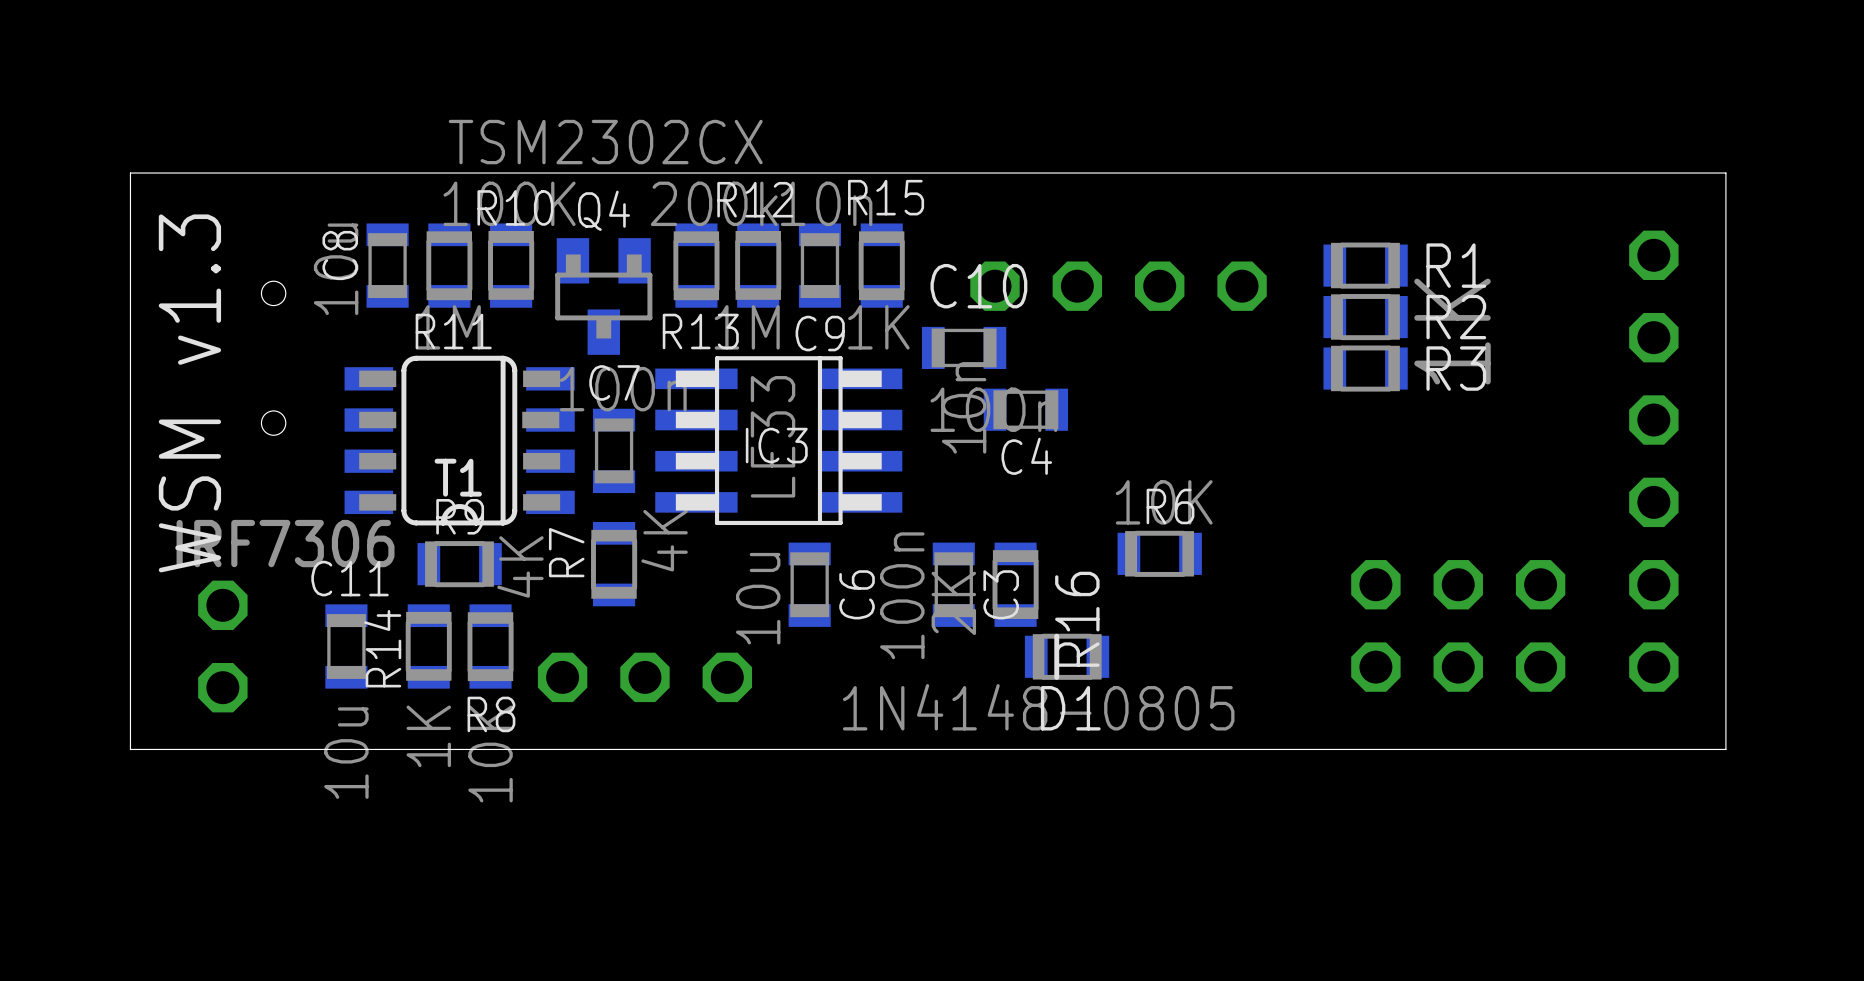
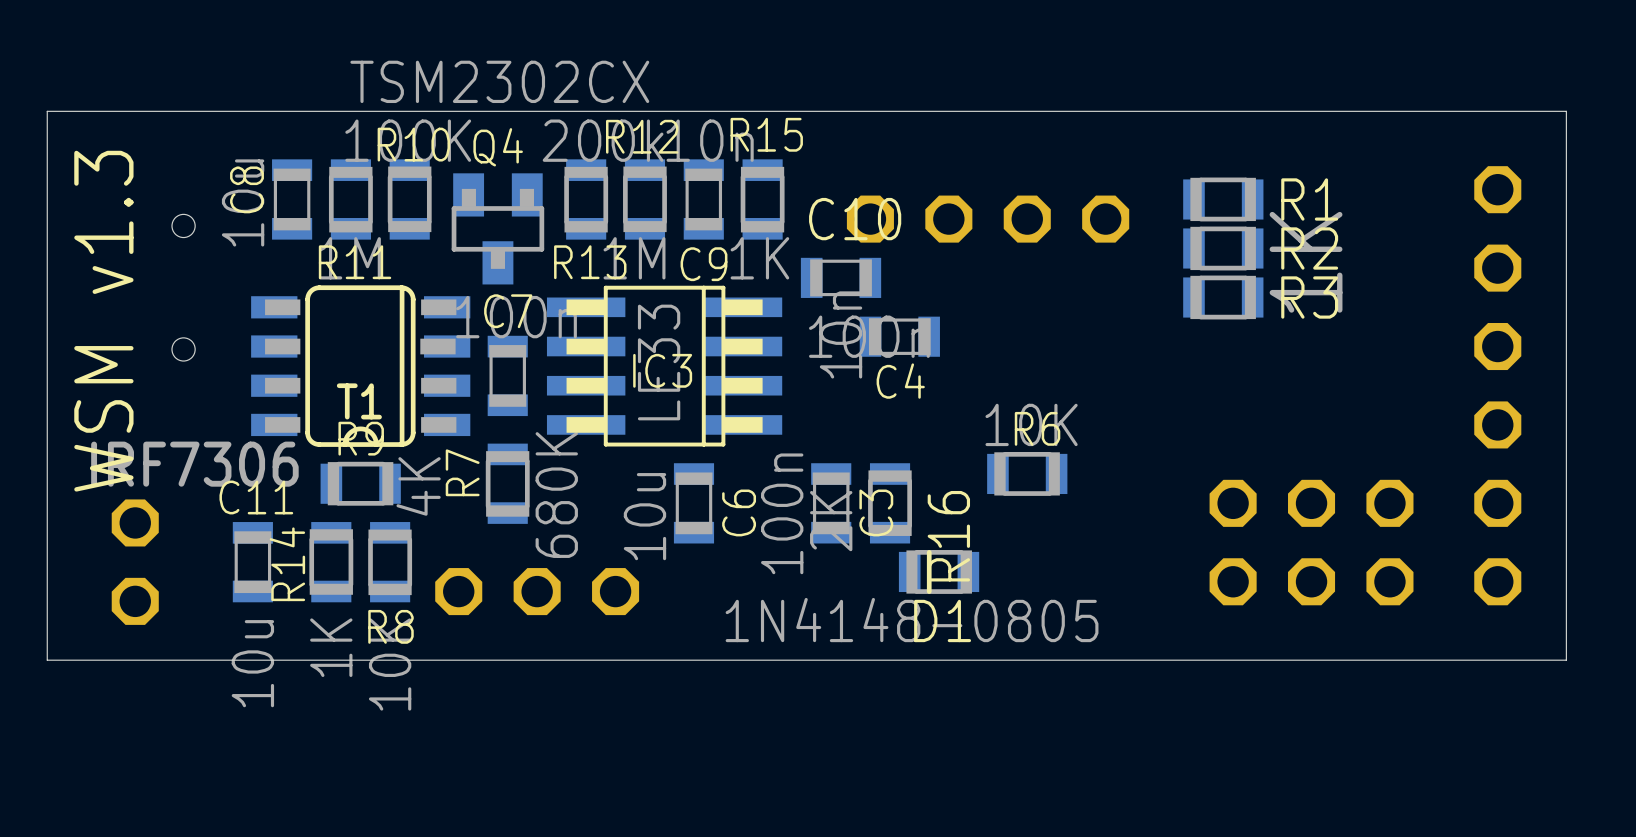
R7 value: 4K (664, 540) -> 680K (556, 495)

